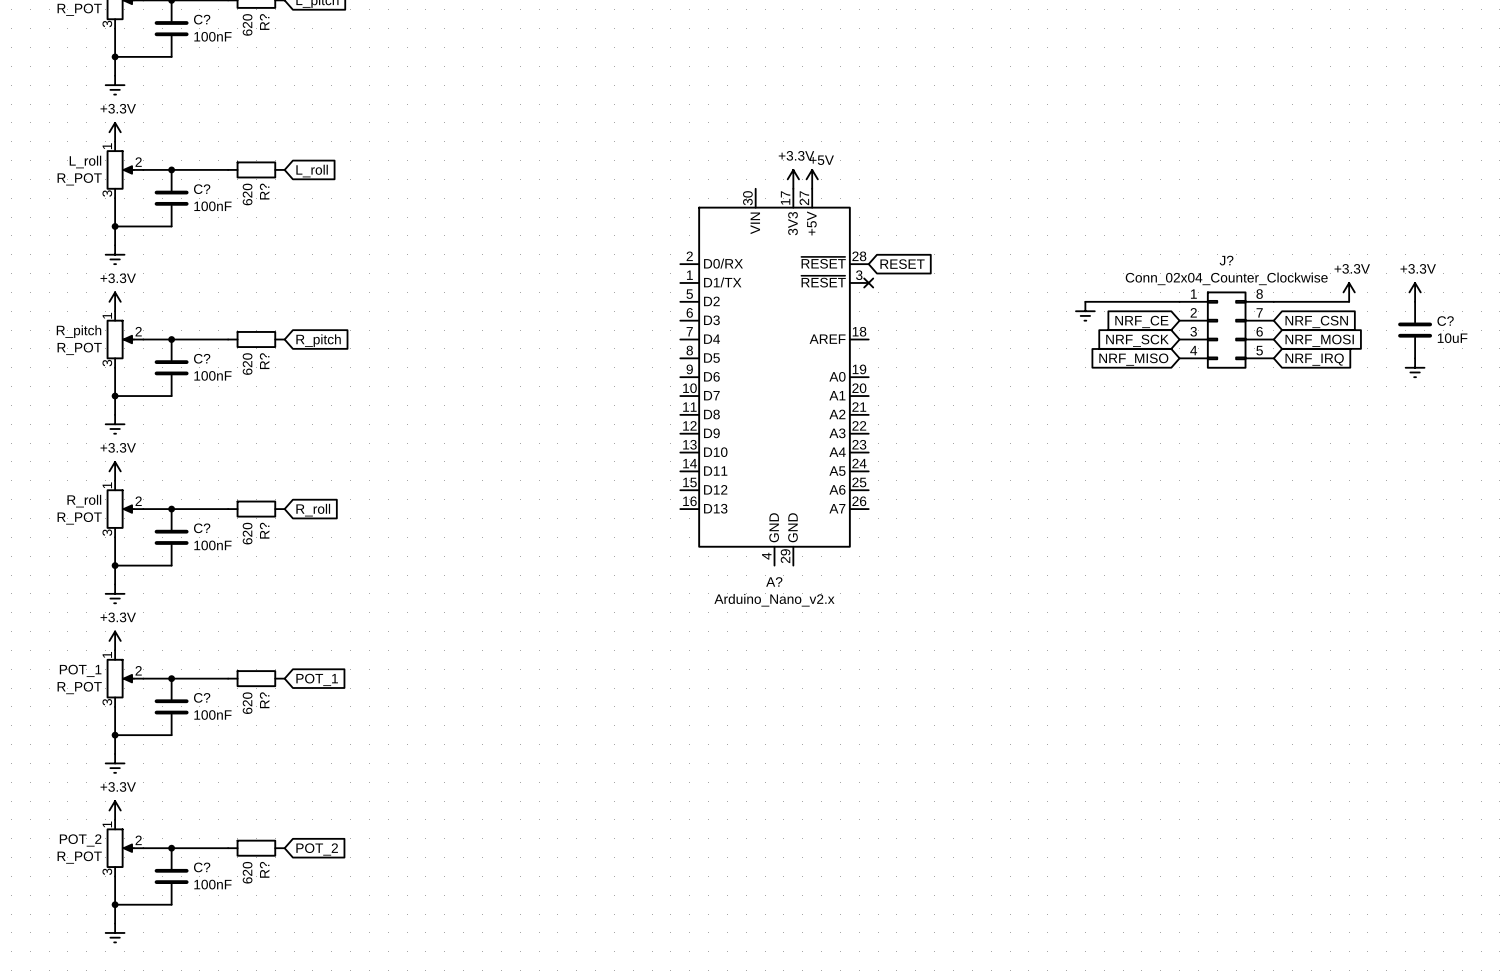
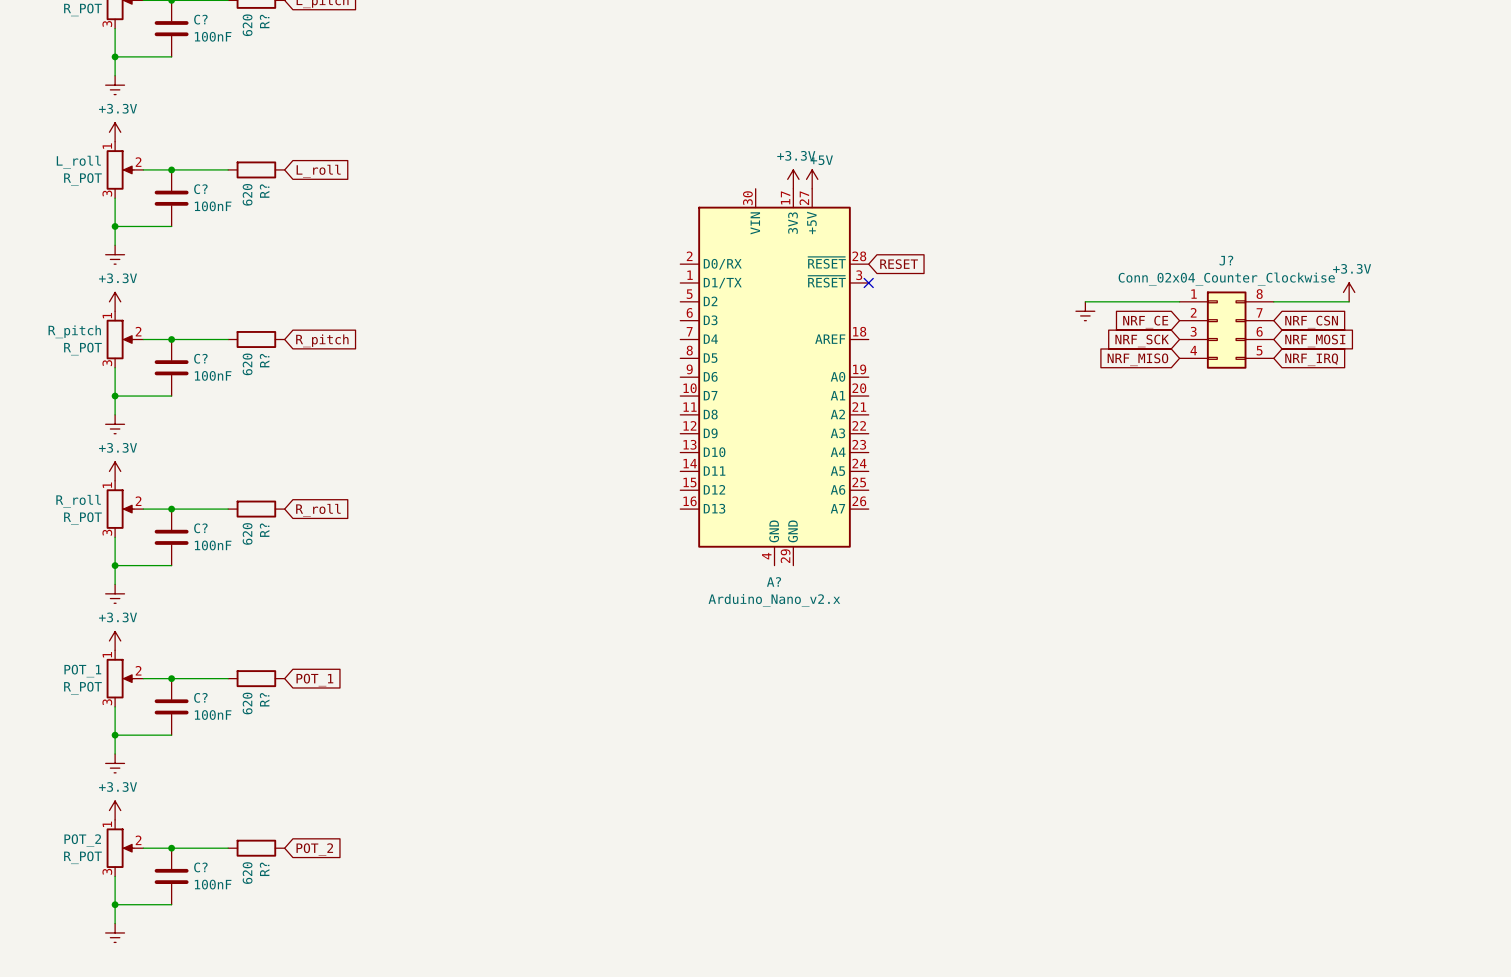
power symbol: +3.3V (1415, 292) -> none
C?: 10uF (1415, 330) -> none
power symbol: (1415, 367) -> none

